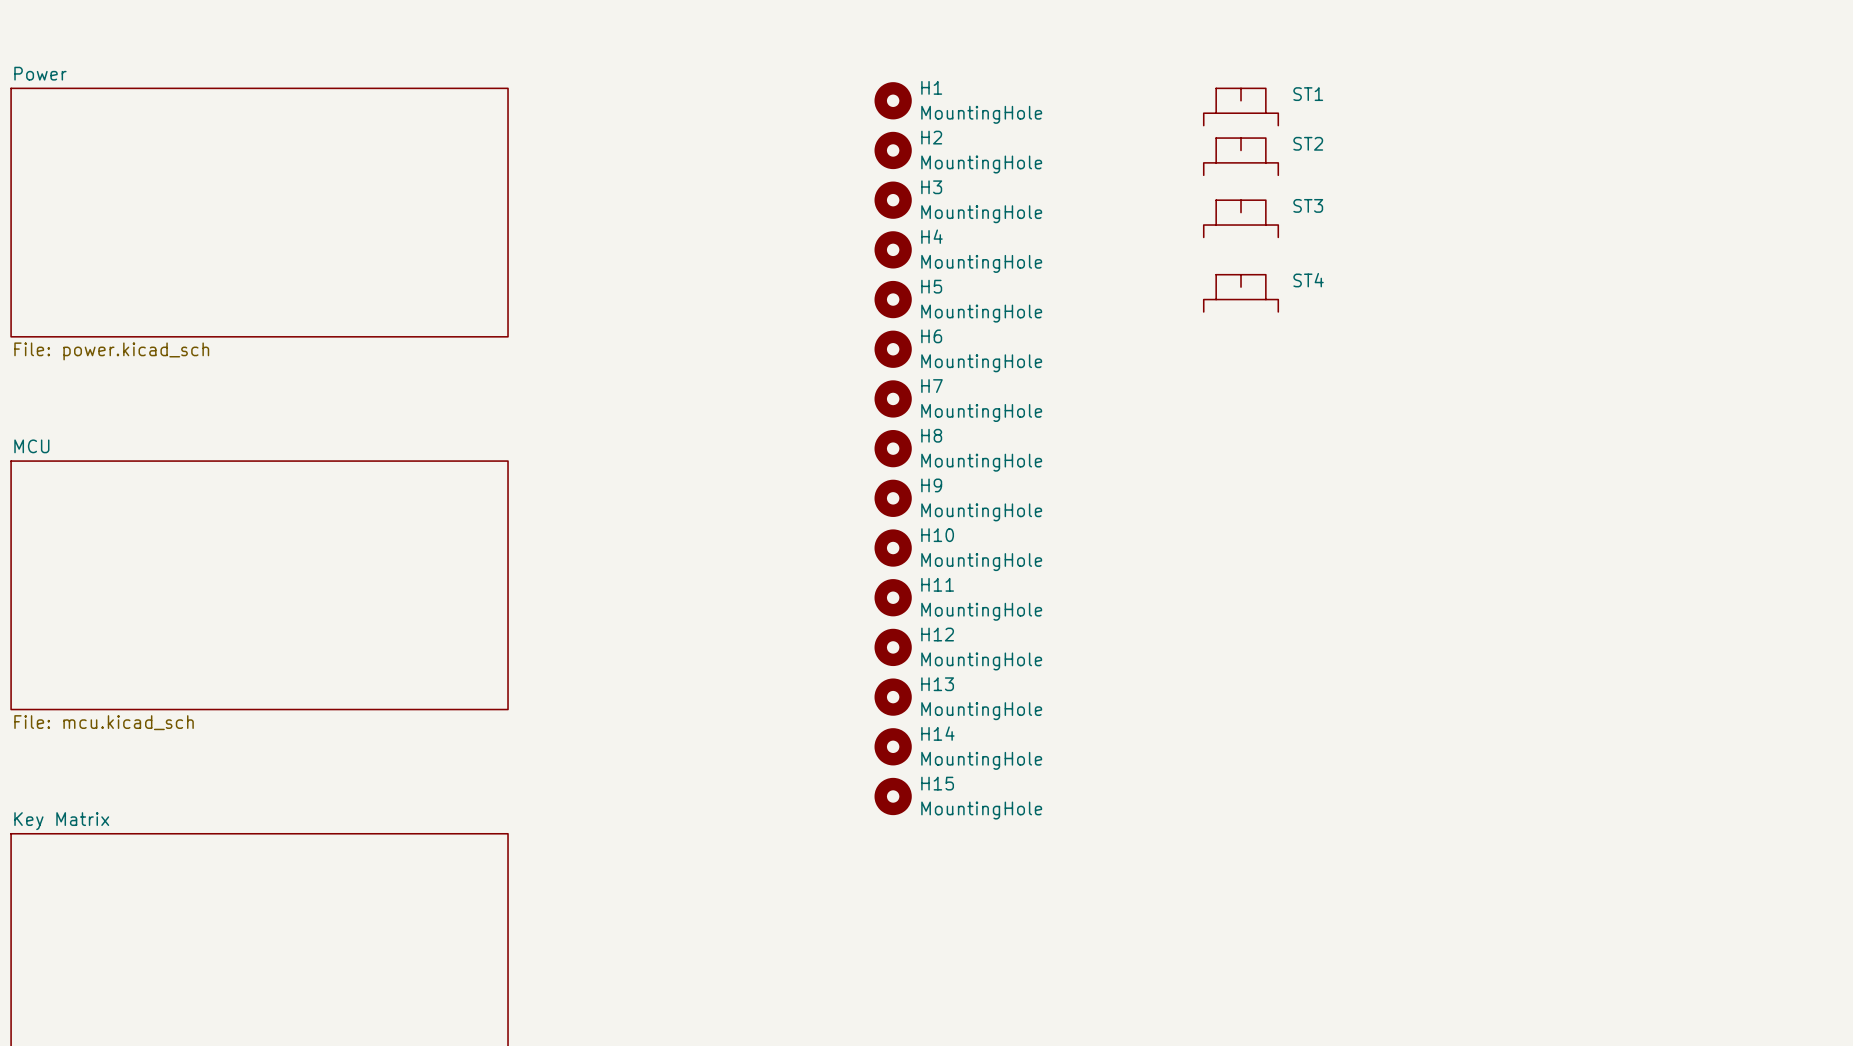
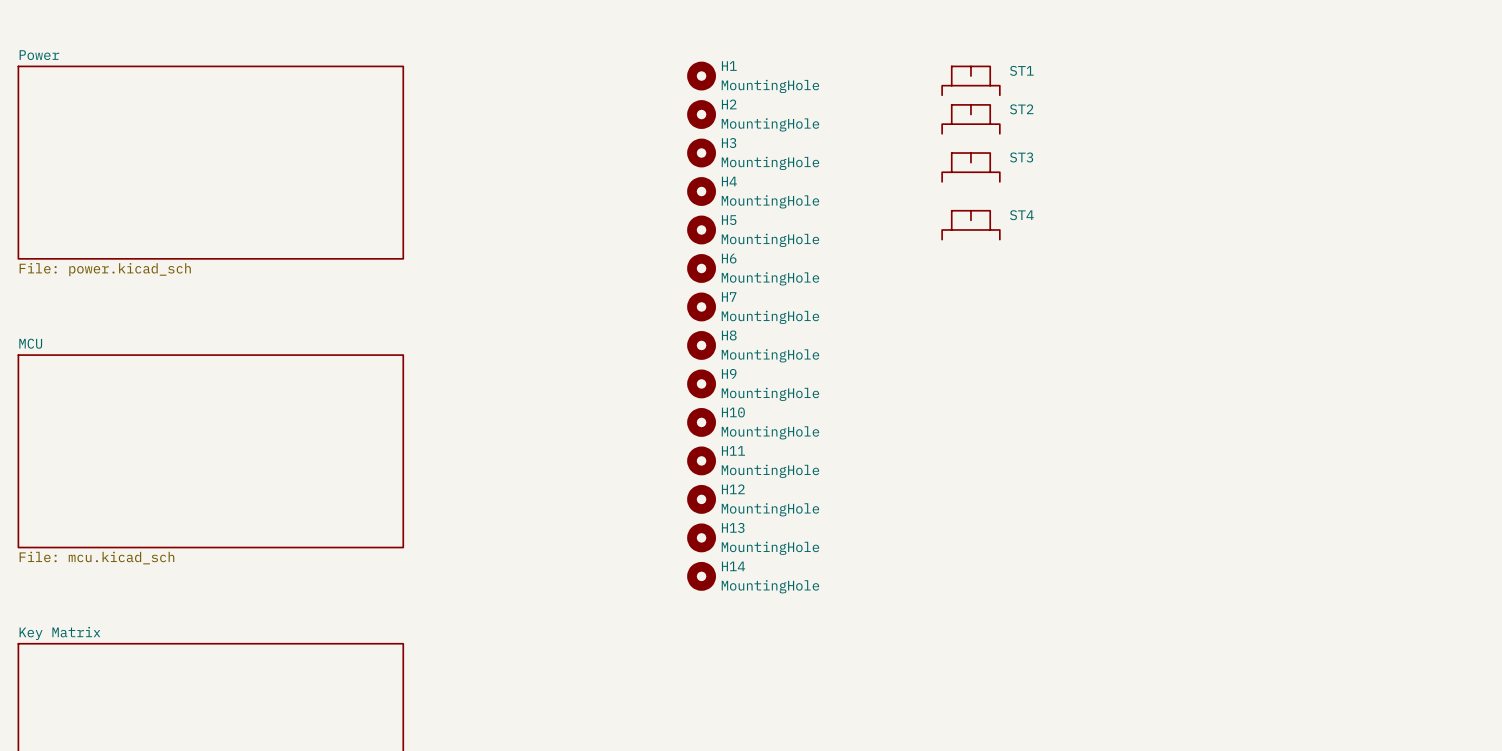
H15: MountingHole (893, 796) -> none

